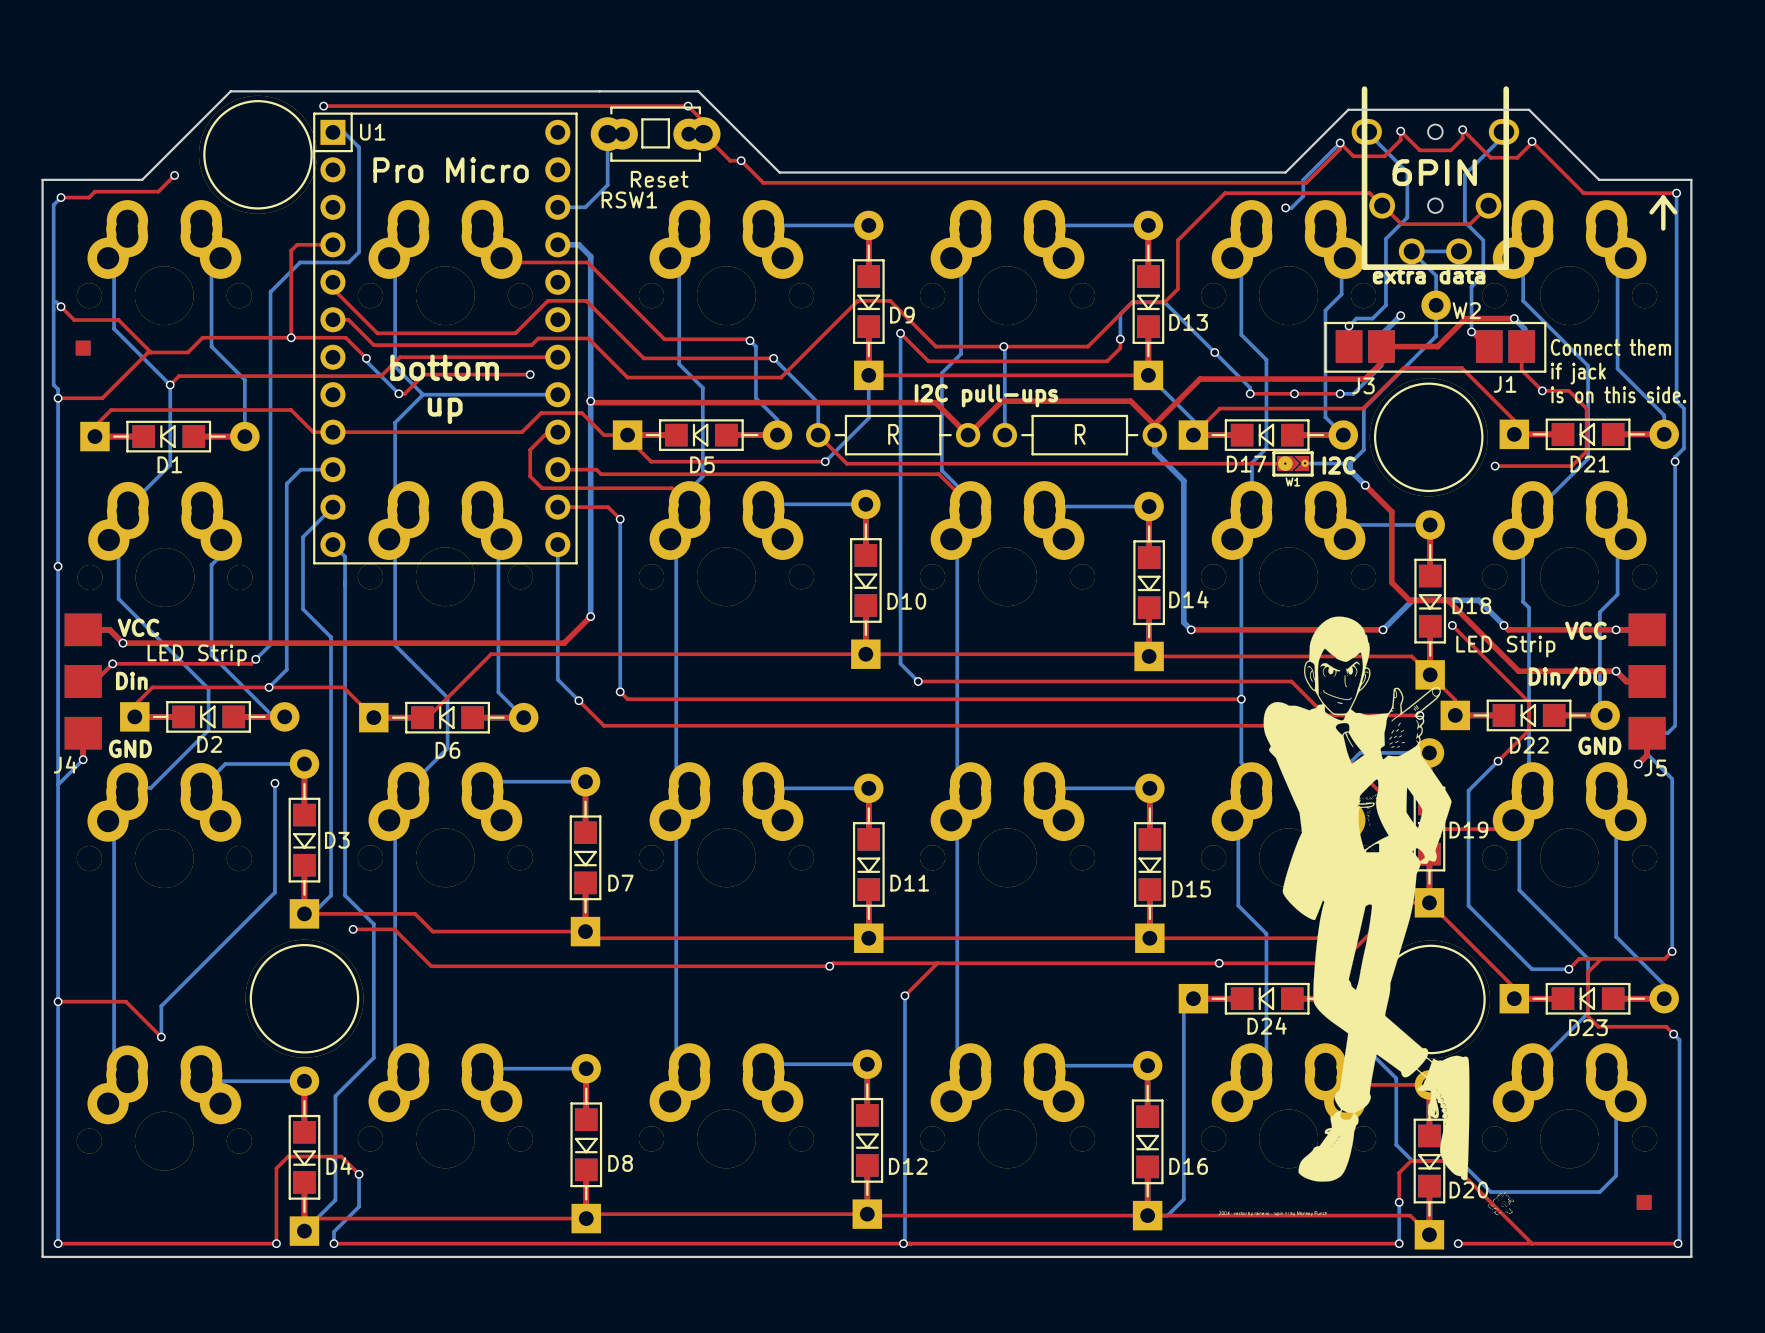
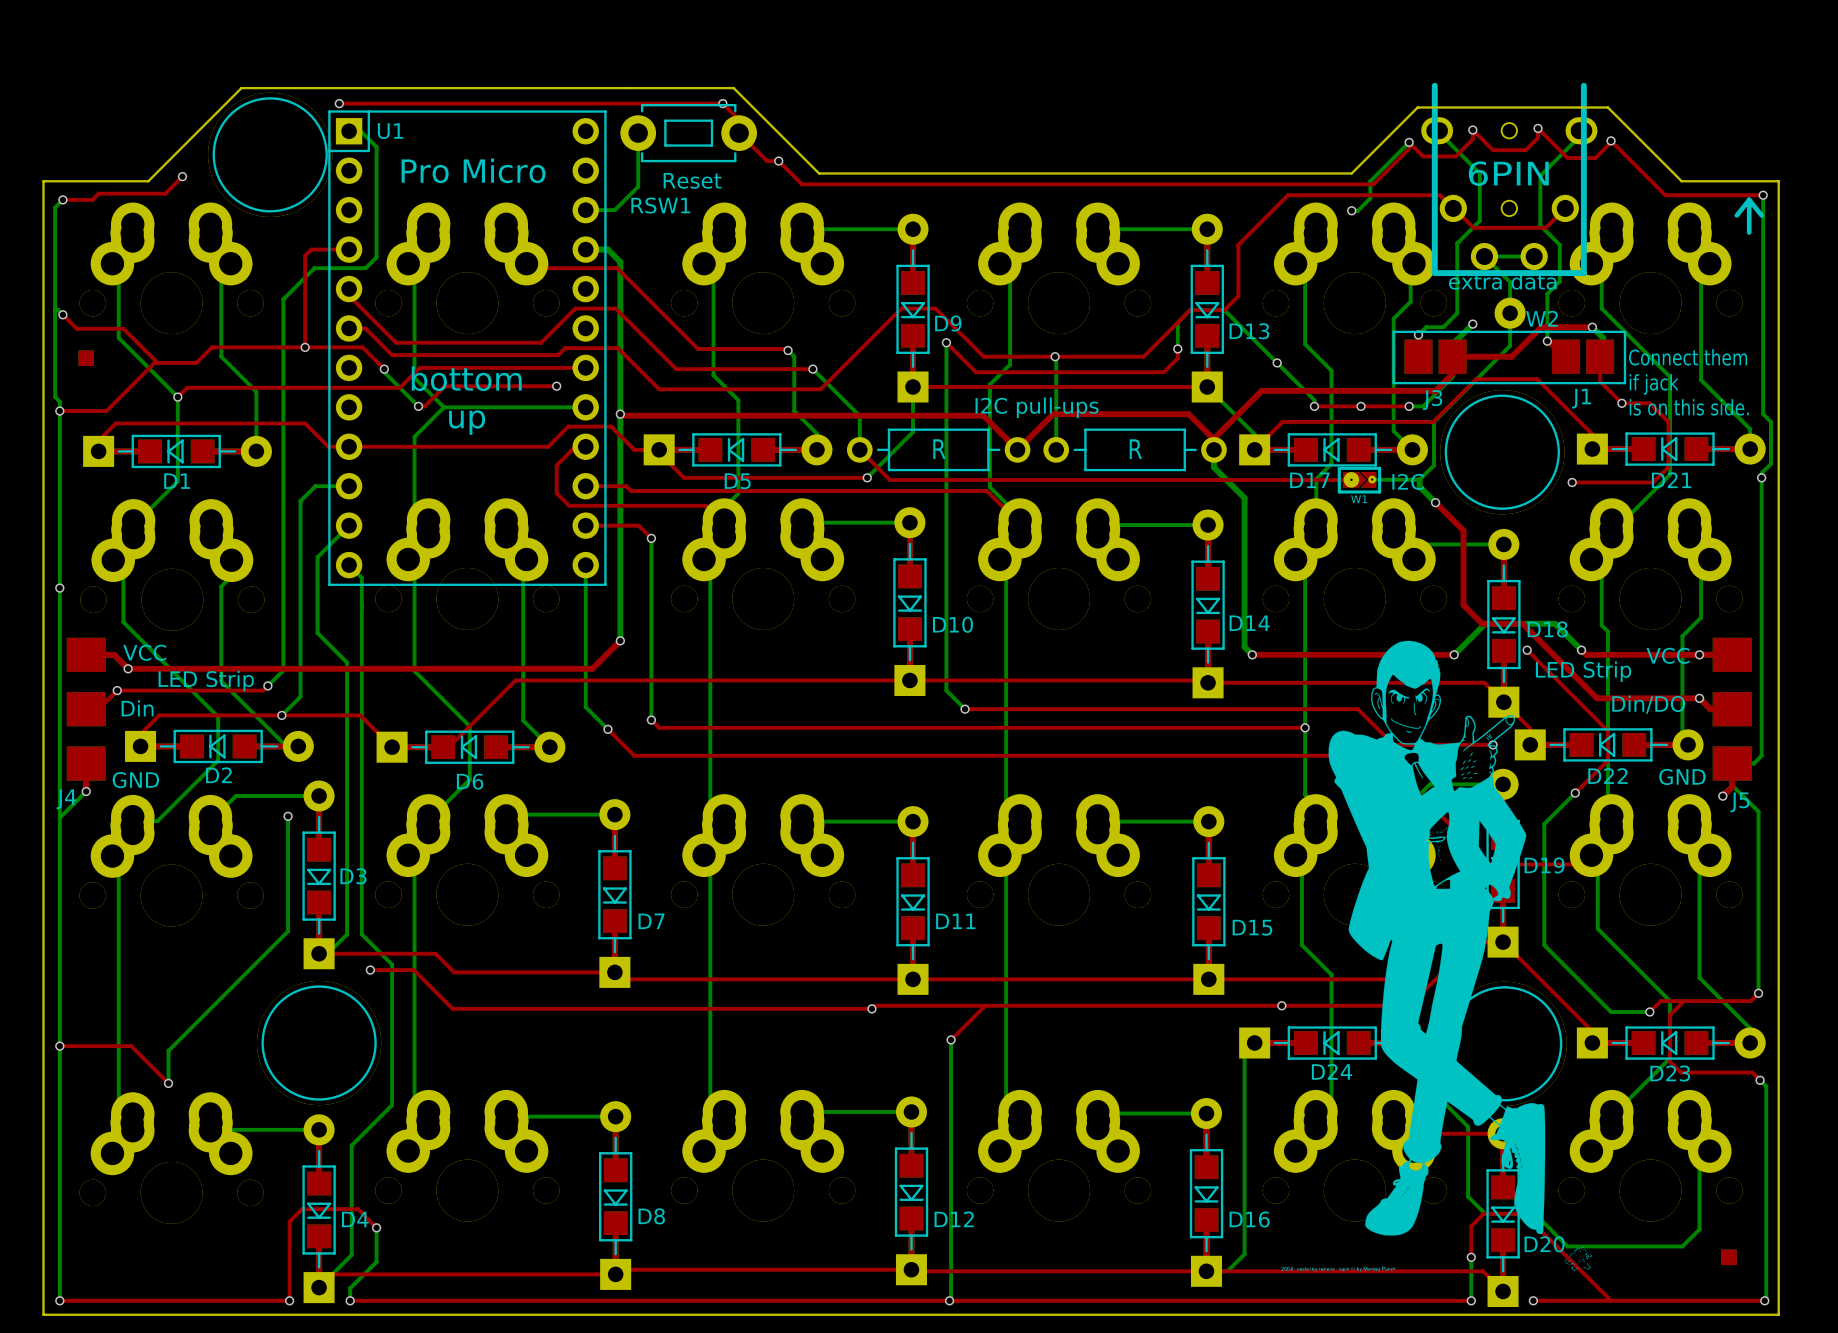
RSW1 footprint: [590, 106, 721, 162] -> [620, 104, 758, 163]

